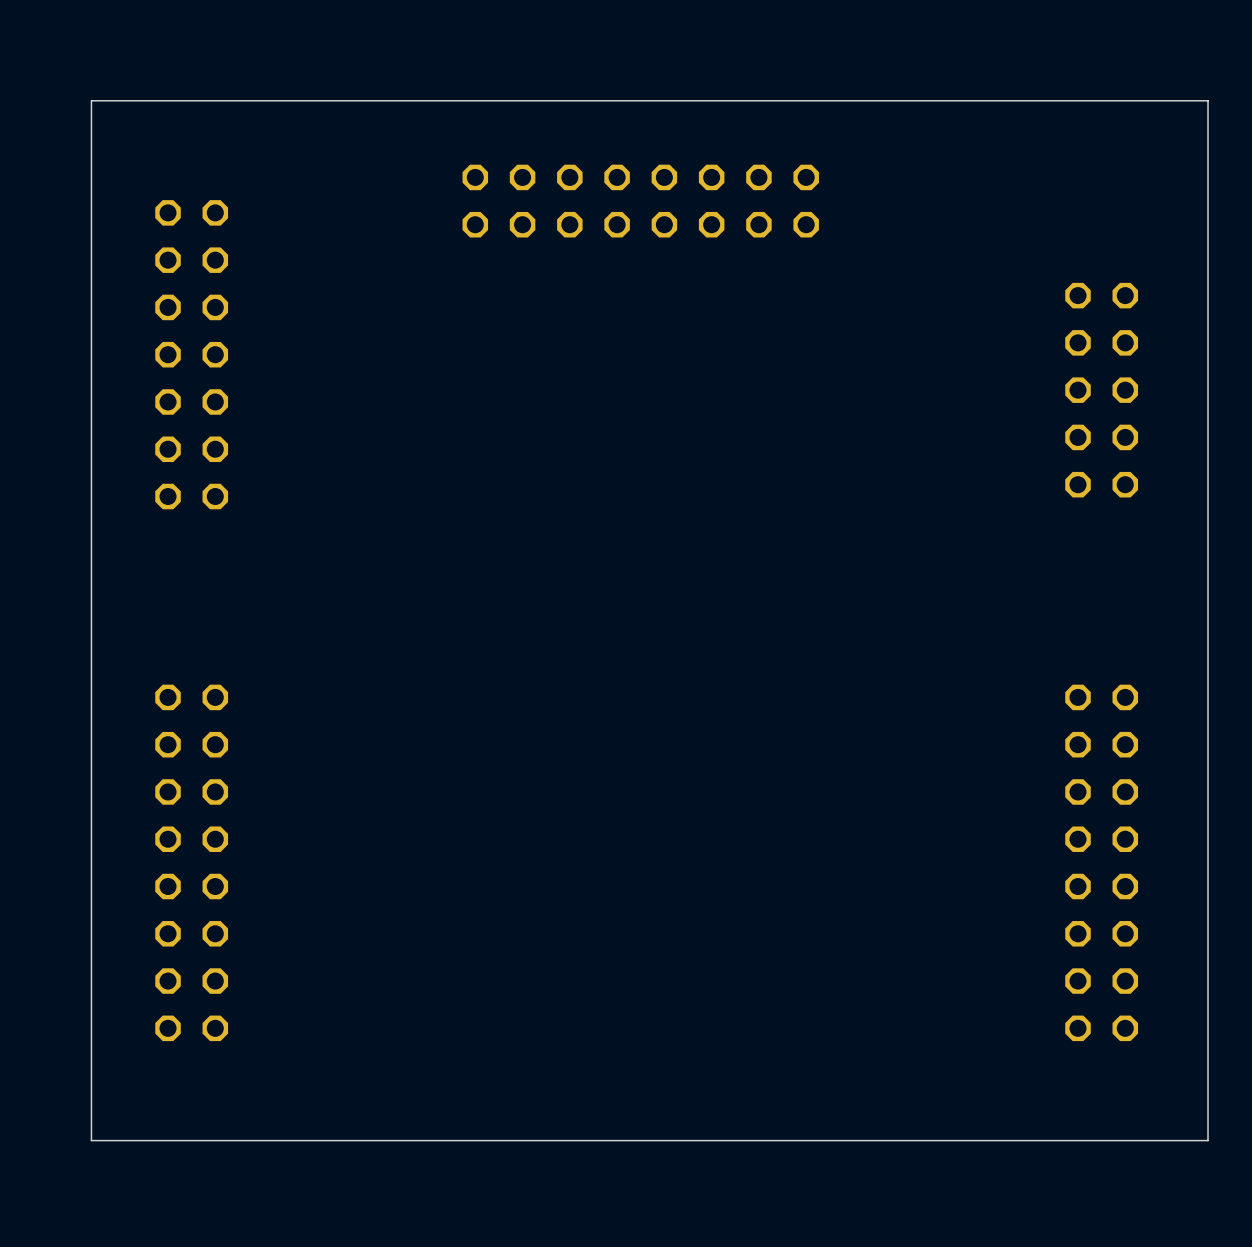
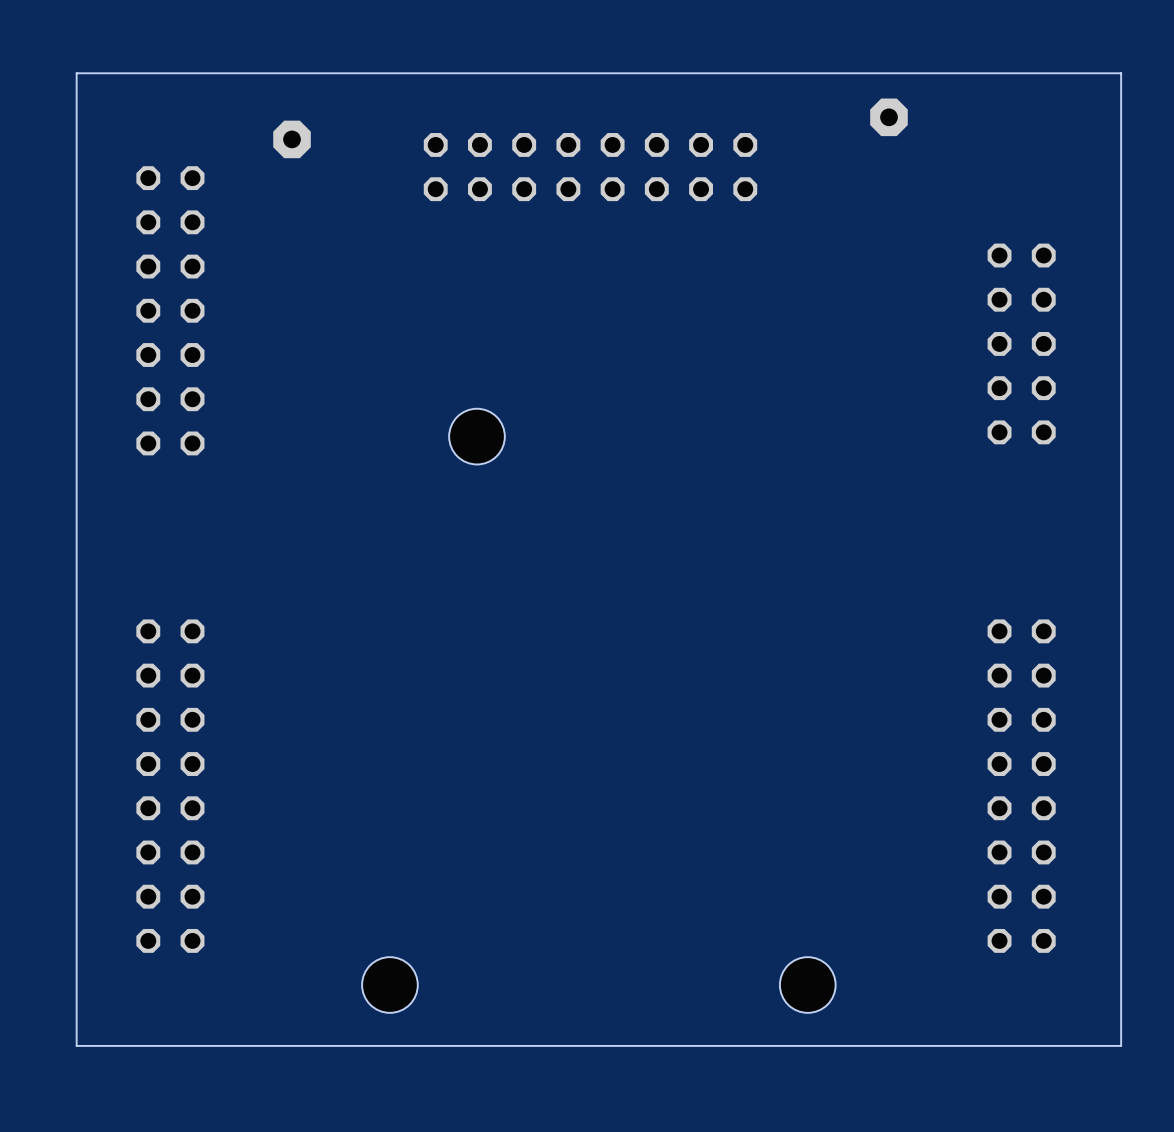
part: none -> (888, 117)
part: none -> (292, 139)
hole: none -> (476, 436)
hole: none -> (389, 985)
hole: none -> (807, 985)

